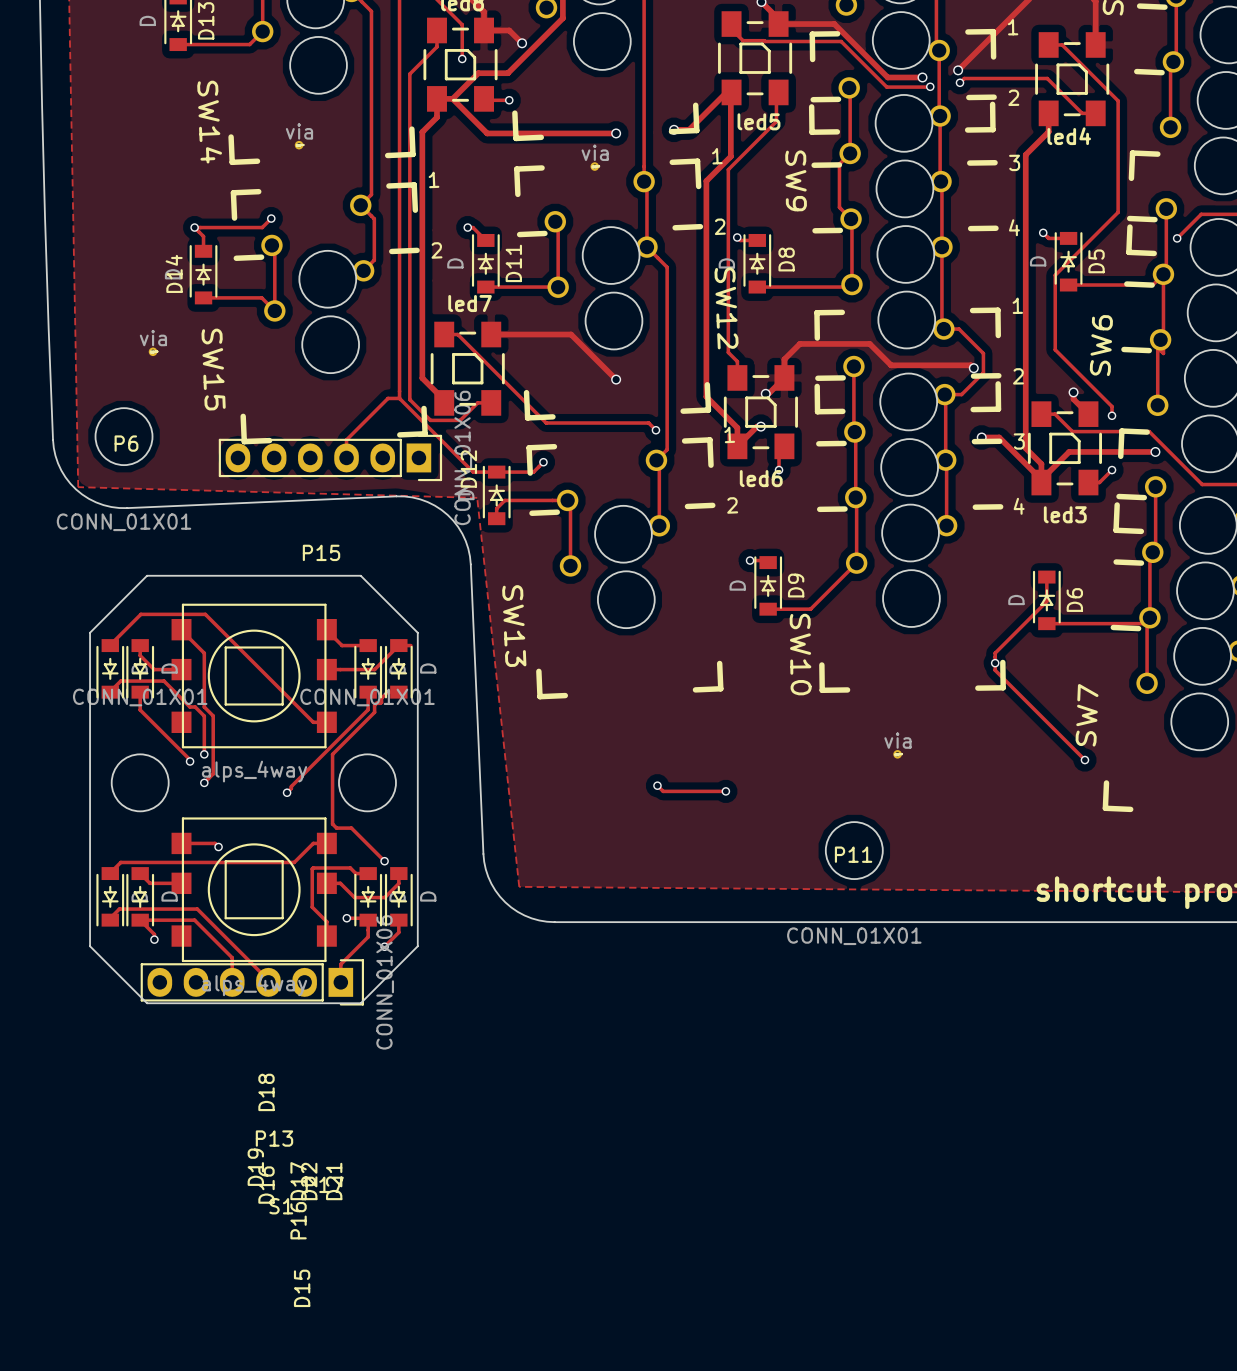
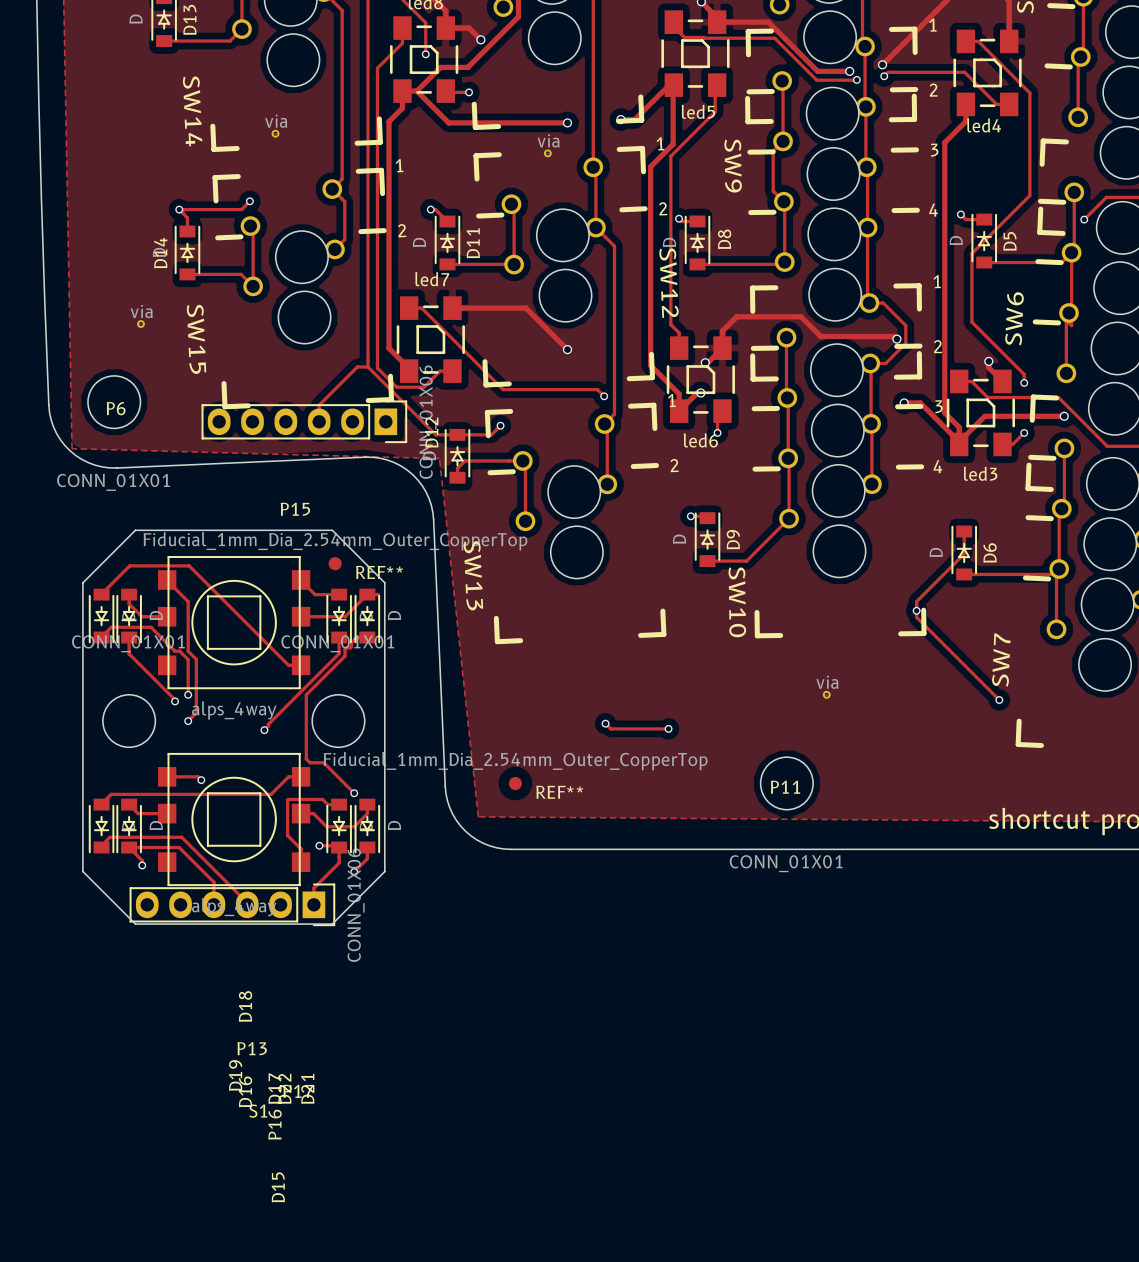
REF**: none -> Fiducial_1mm_Dia_2.54mm_Outer_CopperTop (335, 563)
REF**: none -> Fiducial_1mm_Dia_2.54mm_Outer_CopperTop (515, 783)

